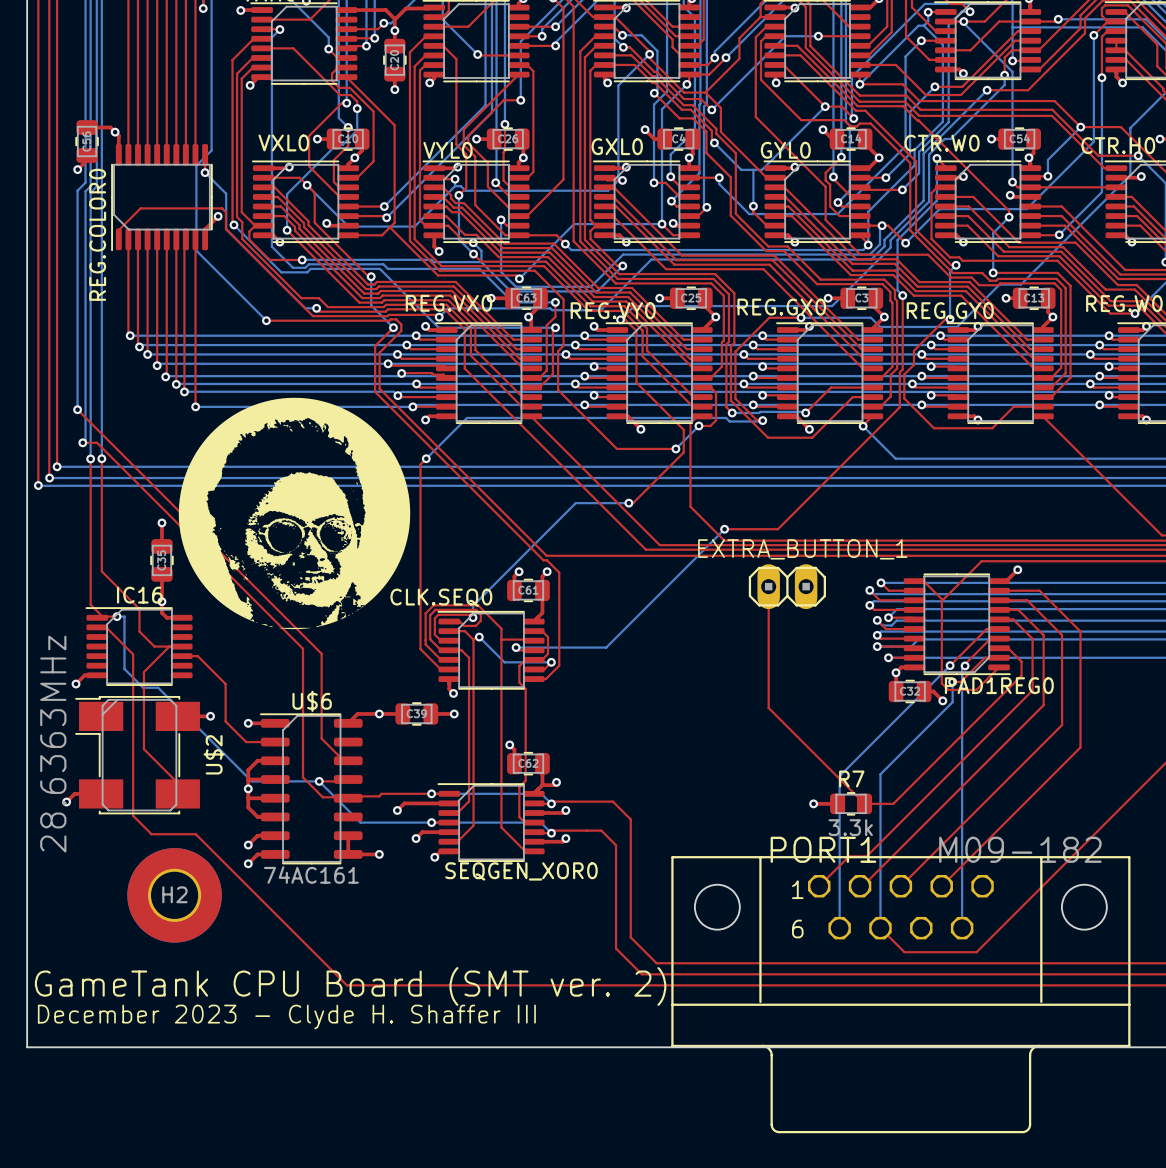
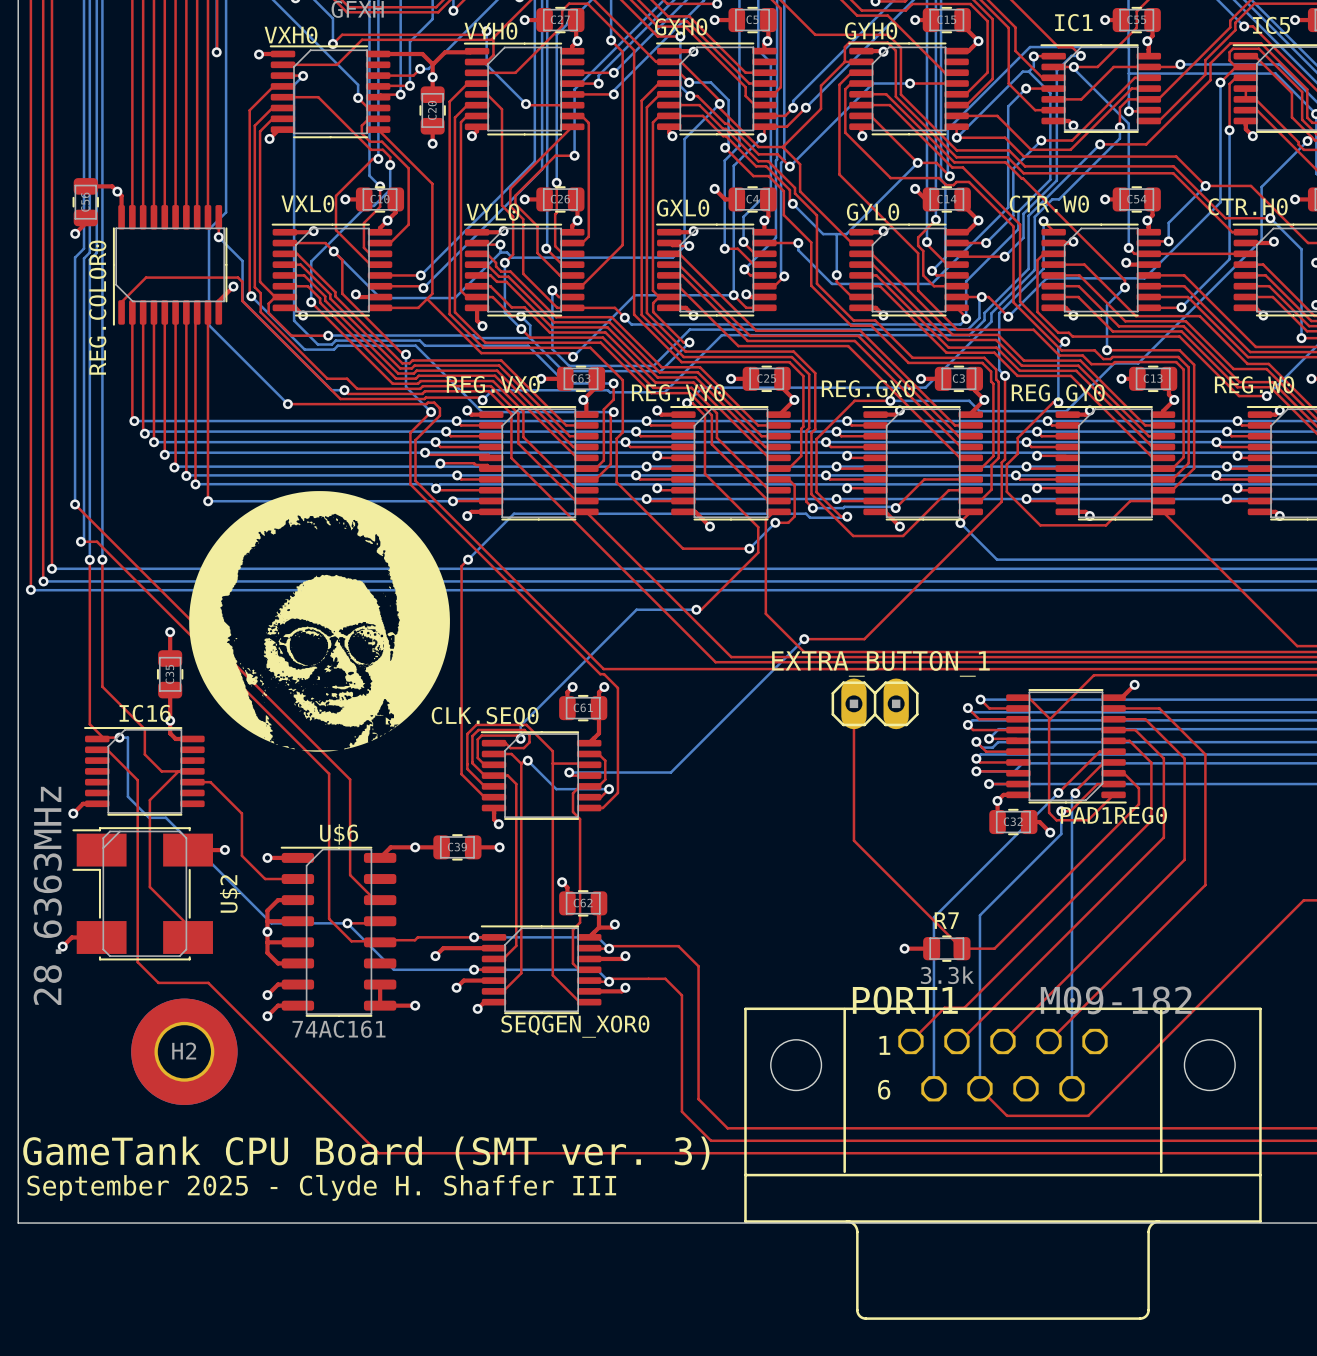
text: GameTank CPU Board (SMT ver. 2) (350, 986) -> GameTank CPU Board (SMT ver. 3) (366, 1153)
text: December 2023 - Clyde H. Shaffer III (286, 1016) -> September 2025 - Clyde H. Shaffer III (321, 1187)

